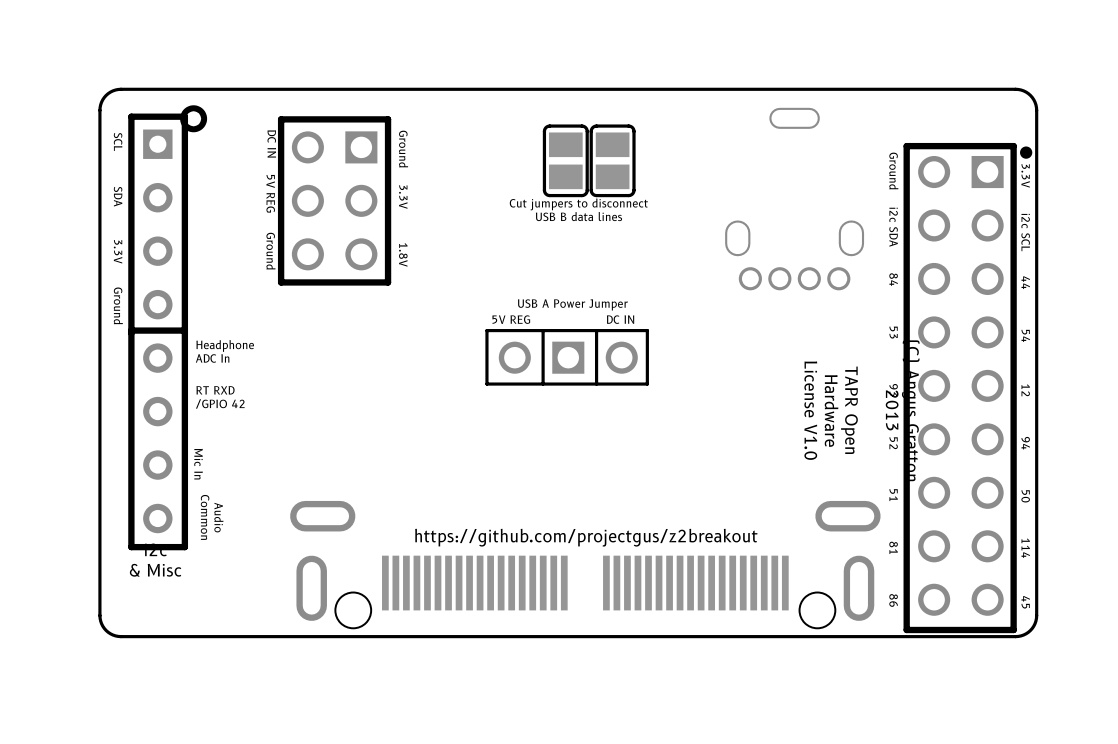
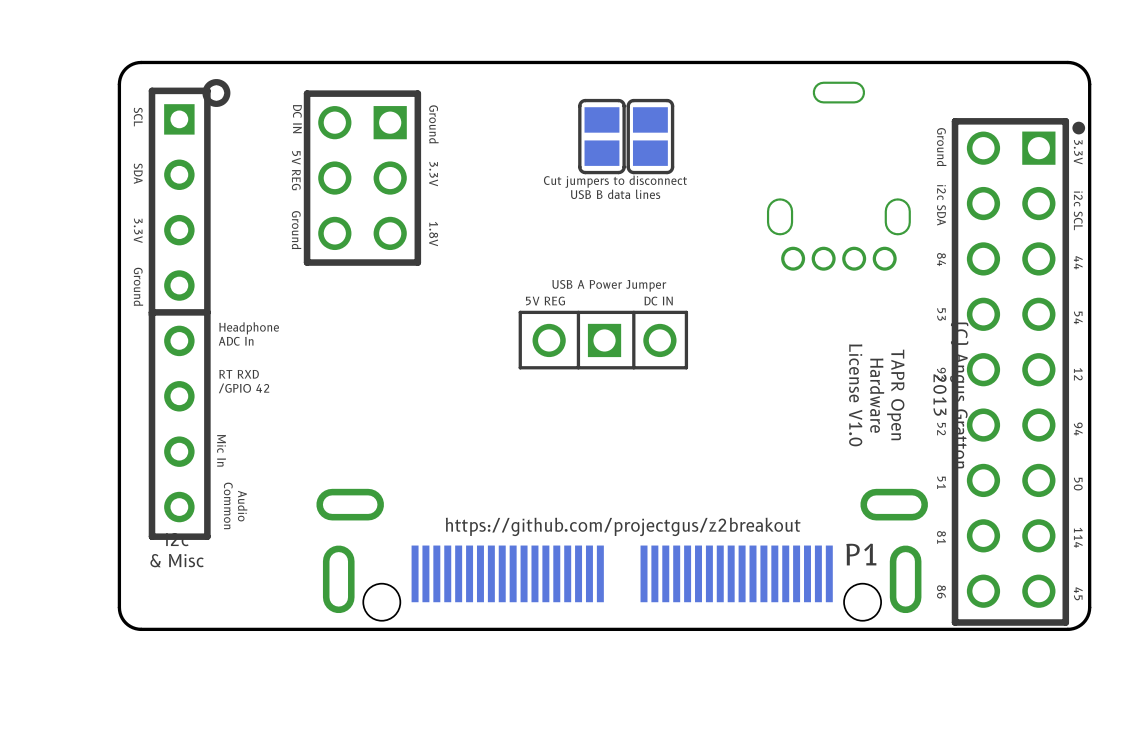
P1 name: none -> P1 (861, 554)

